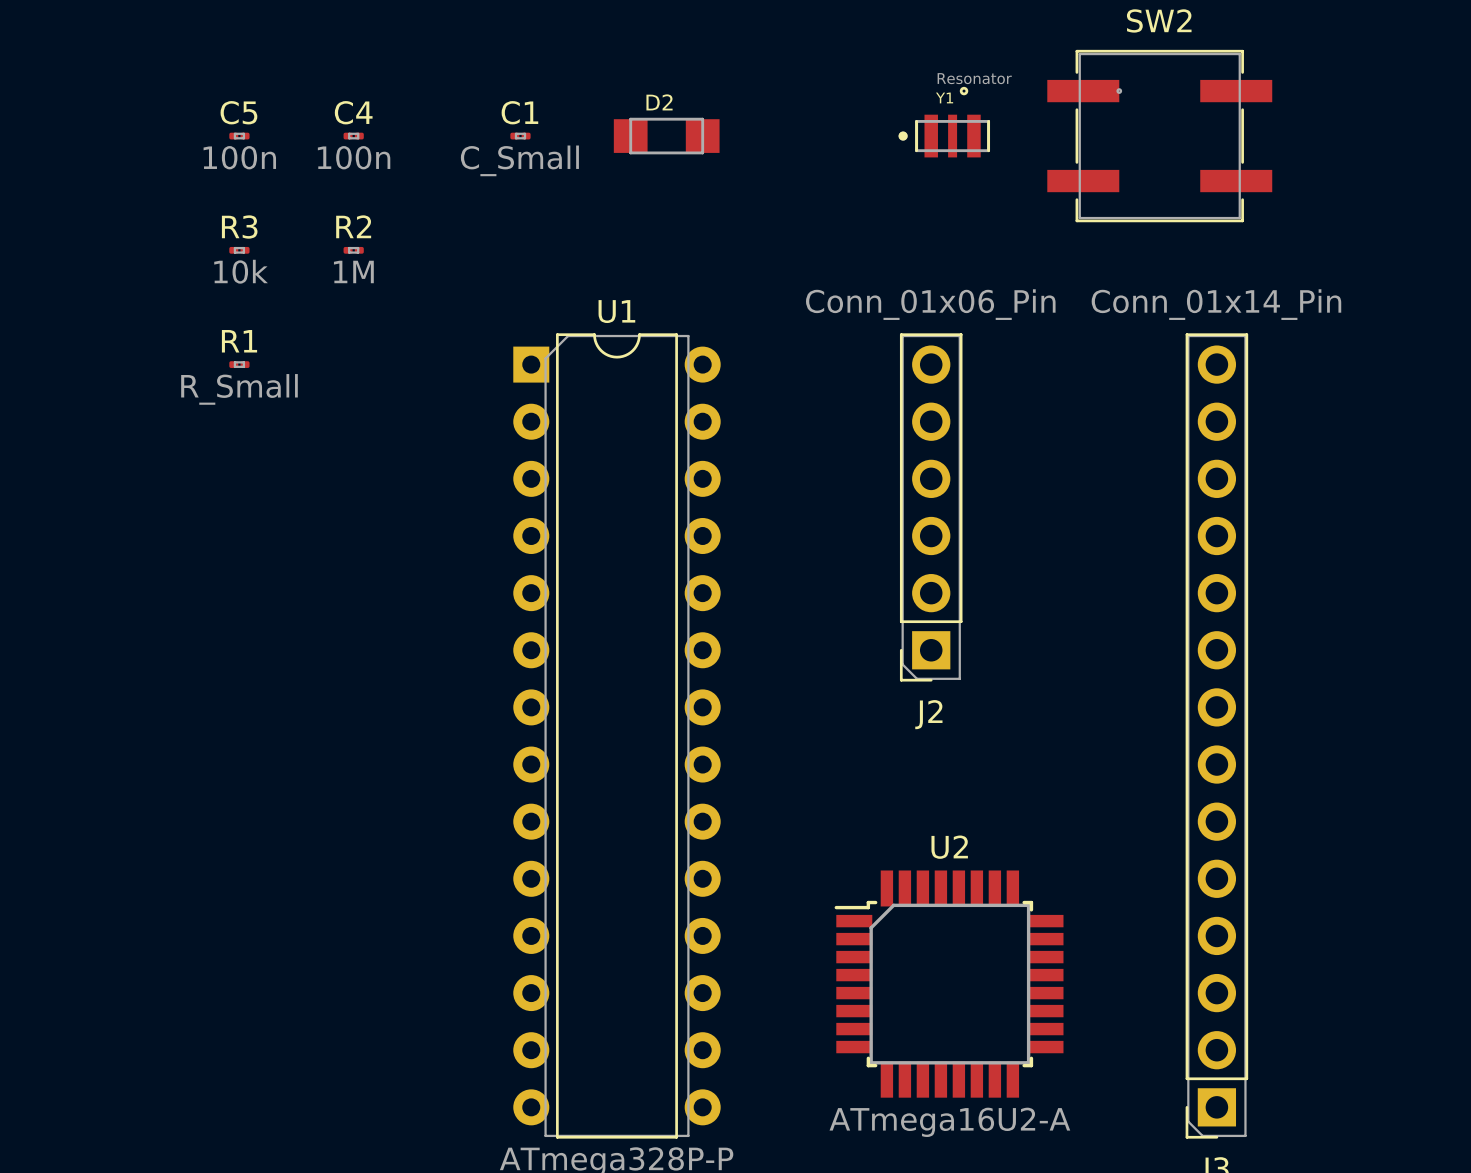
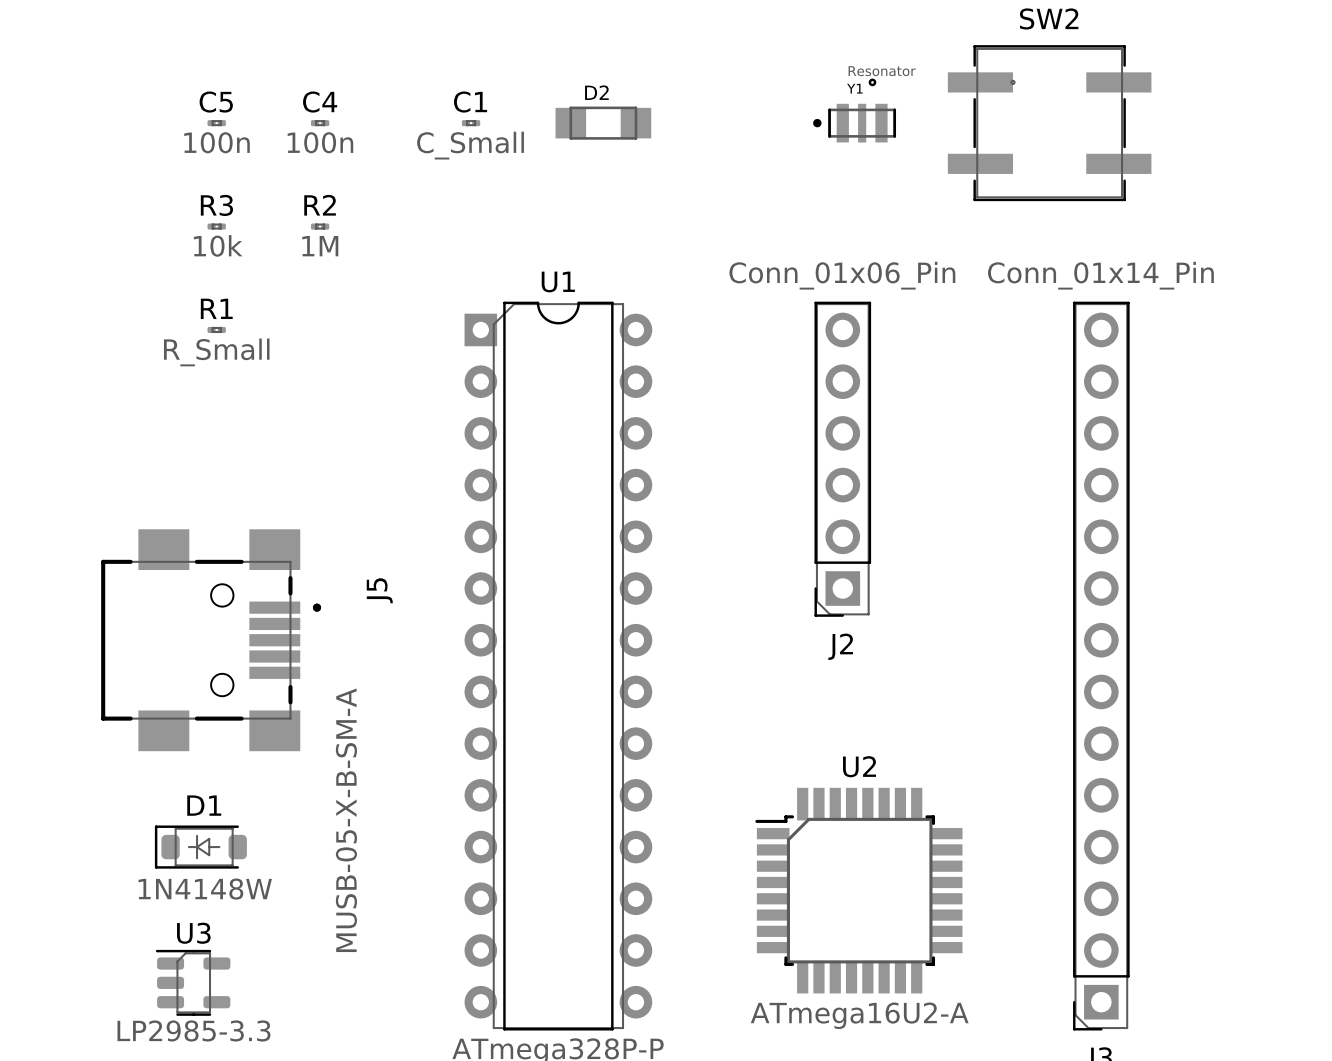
J5: none -> MUSB-05-X-B-SM-A (211, 640)
D1: none -> 1N4148W (200, 847)
U3: none -> LP2985-3.3 (193, 982)

